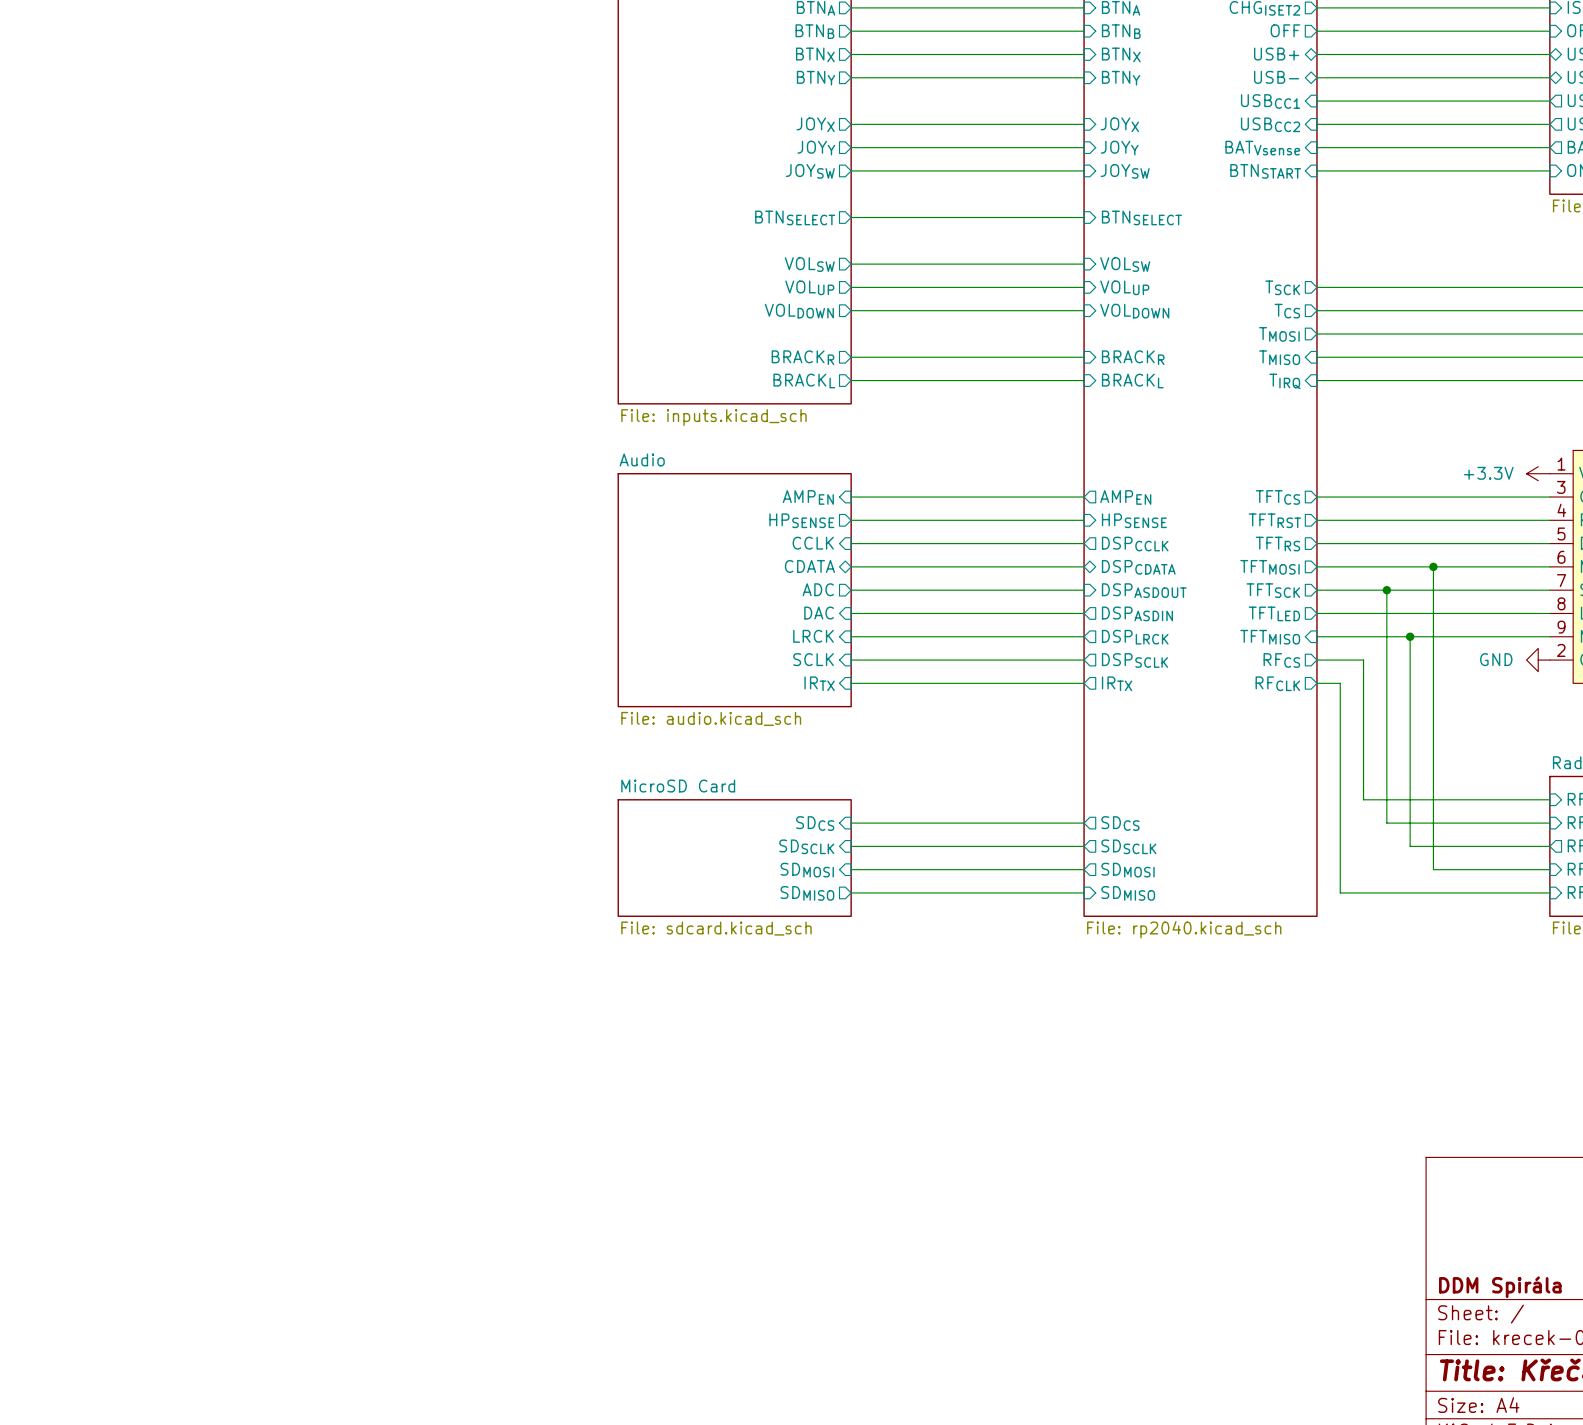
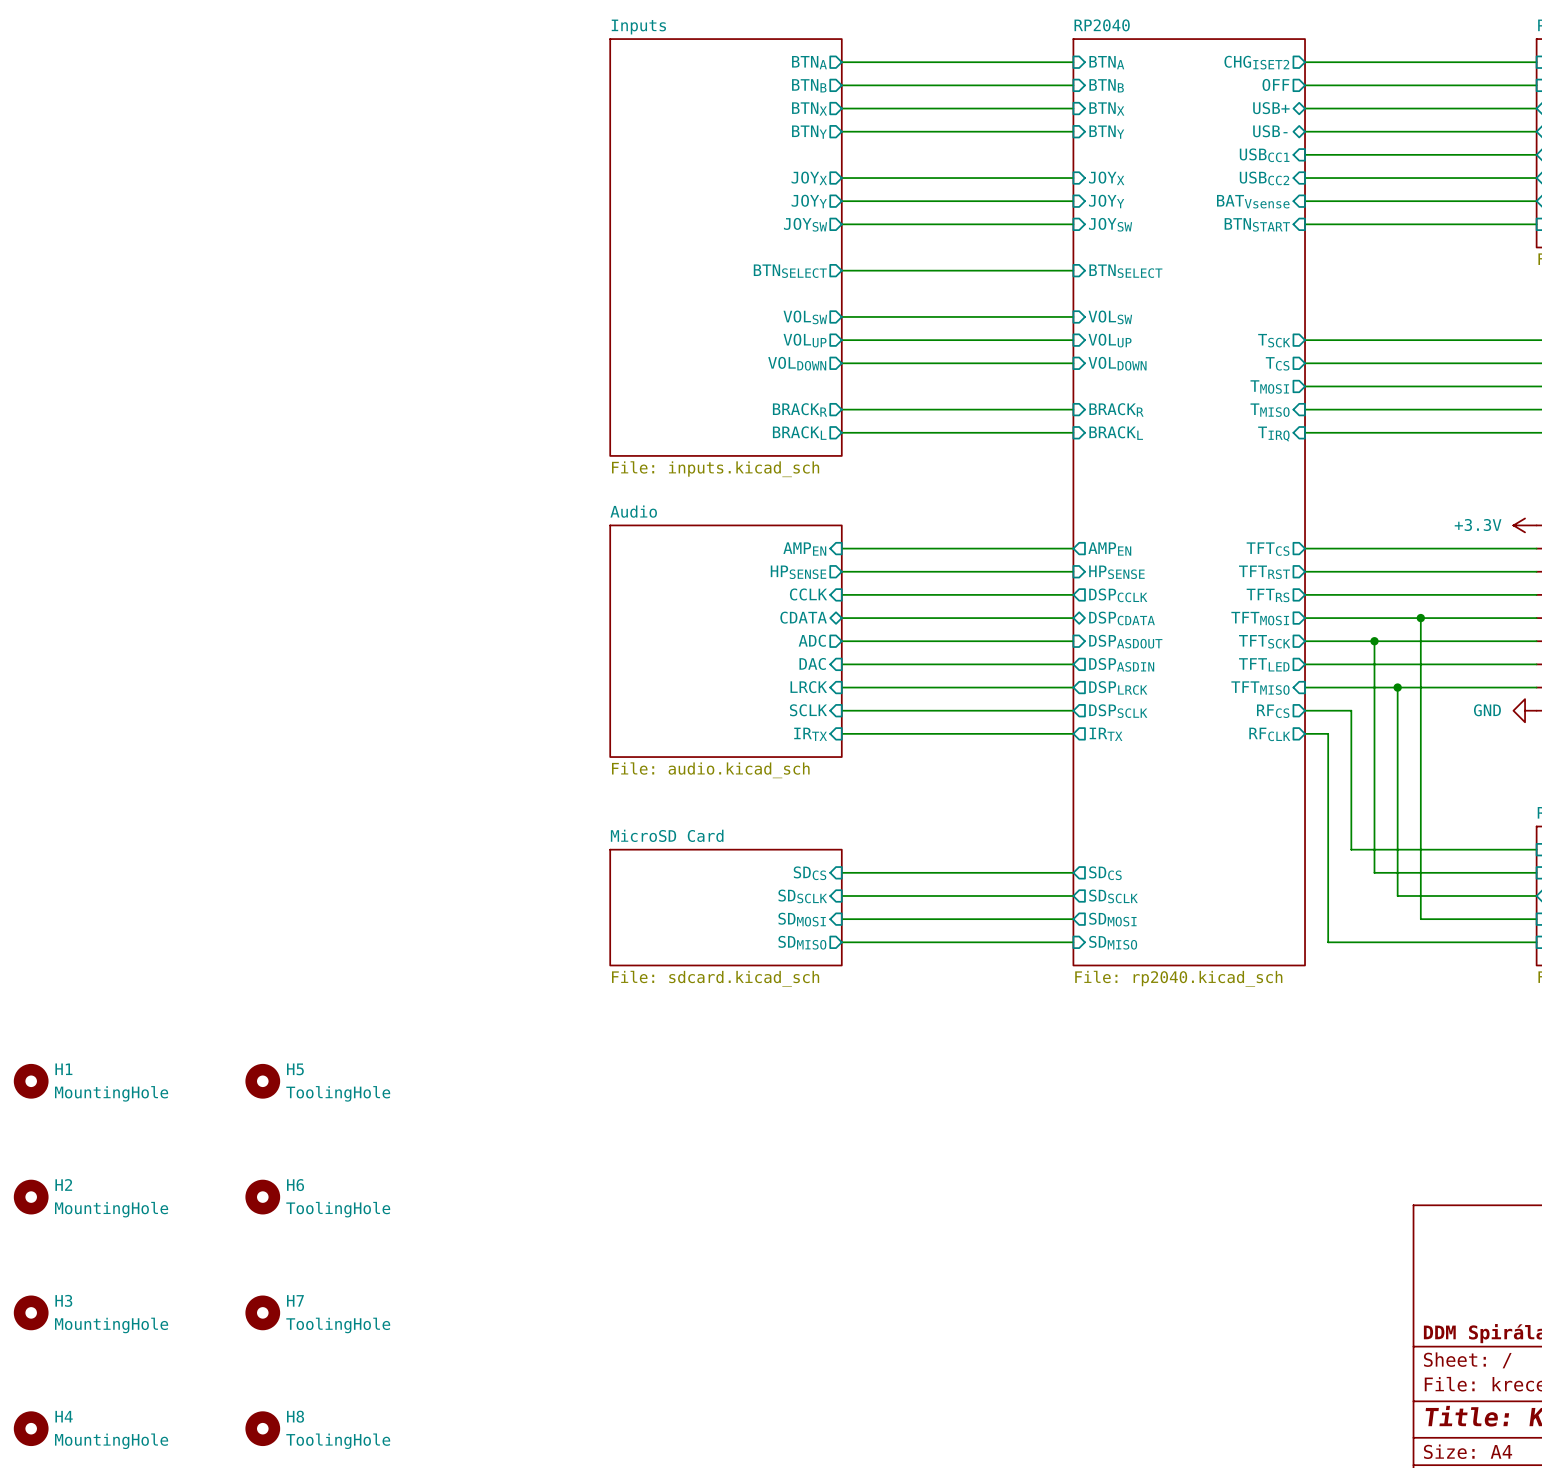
H1: none -> MountingHole (31, 1081)
H5: none -> ToolingHole (262, 1081)
H2: none -> MountingHole (31, 1197)
H6: none -> ToolingHole (262, 1197)
H3: none -> MountingHole (31, 1312)
H7: none -> ToolingHole (262, 1312)
H4: none -> MountingHole (31, 1428)
H8: none -> ToolingHole (262, 1428)

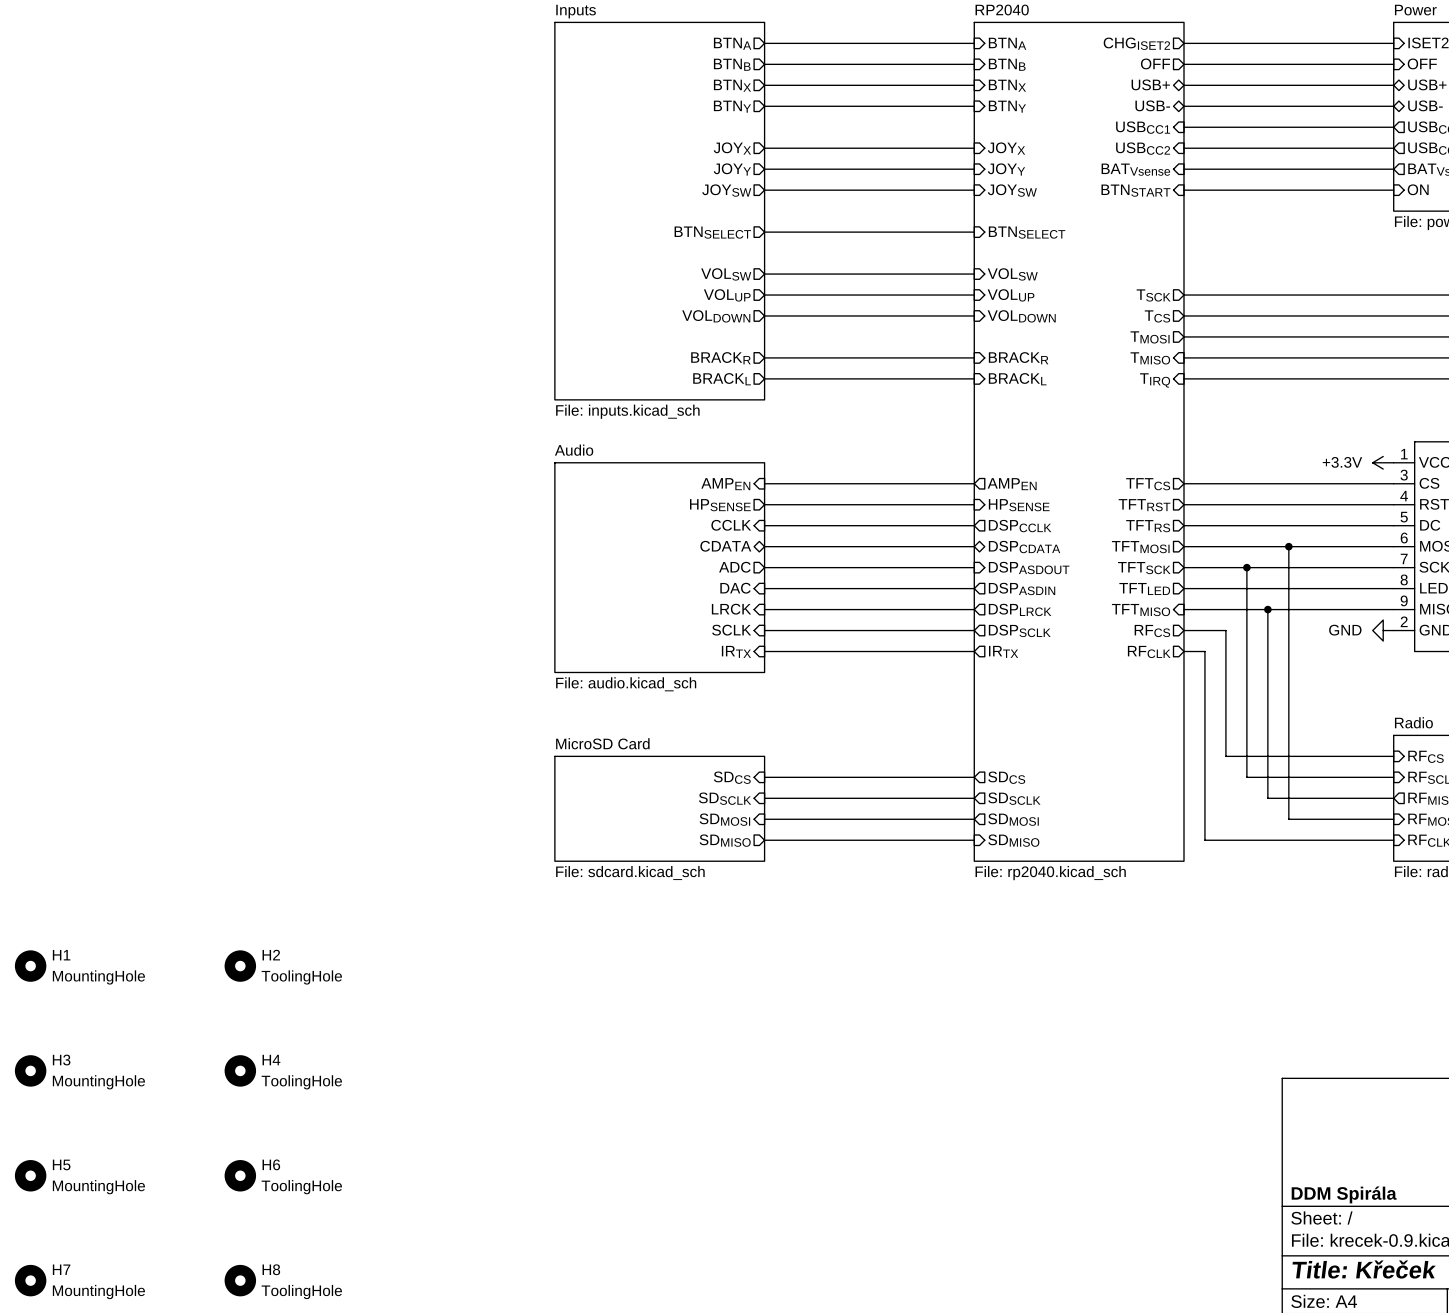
H5 name: H5 (295, 1069) -> H2 (271, 955)
H2 name: H2 (63, 1184) -> H3 (61, 1060)
H6 name: H6 (295, 1185) -> H4 (271, 1060)
H3 name: H3 (63, 1300) -> H5 (61, 1164)
H7 name: H7 (295, 1300) -> H6 (271, 1164)
H4 name: H4 (64, 1416) -> H7 (61, 1269)

